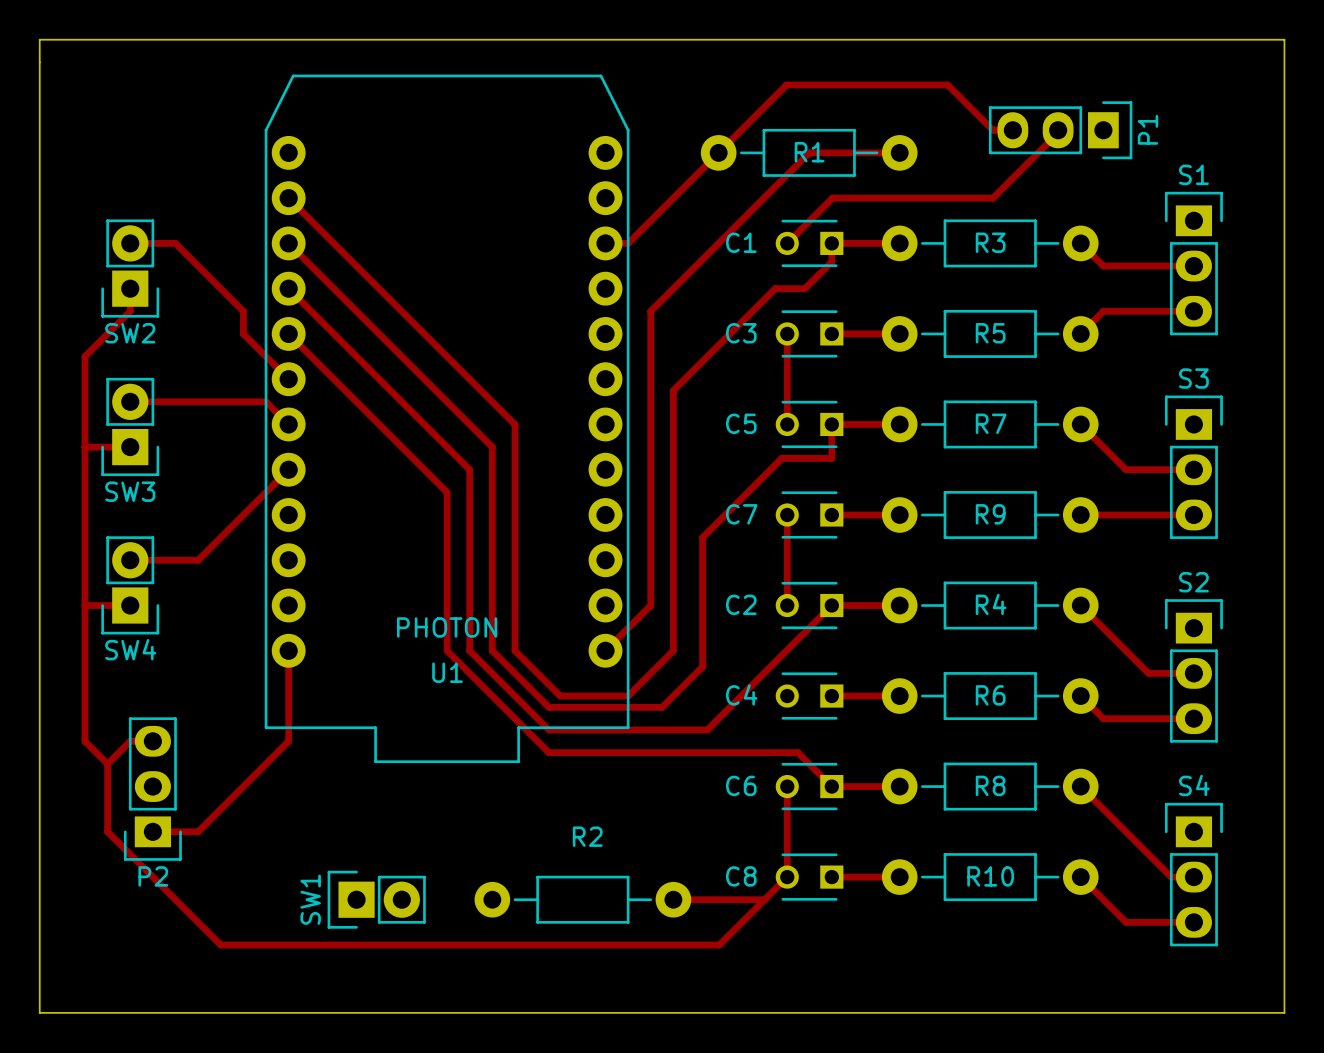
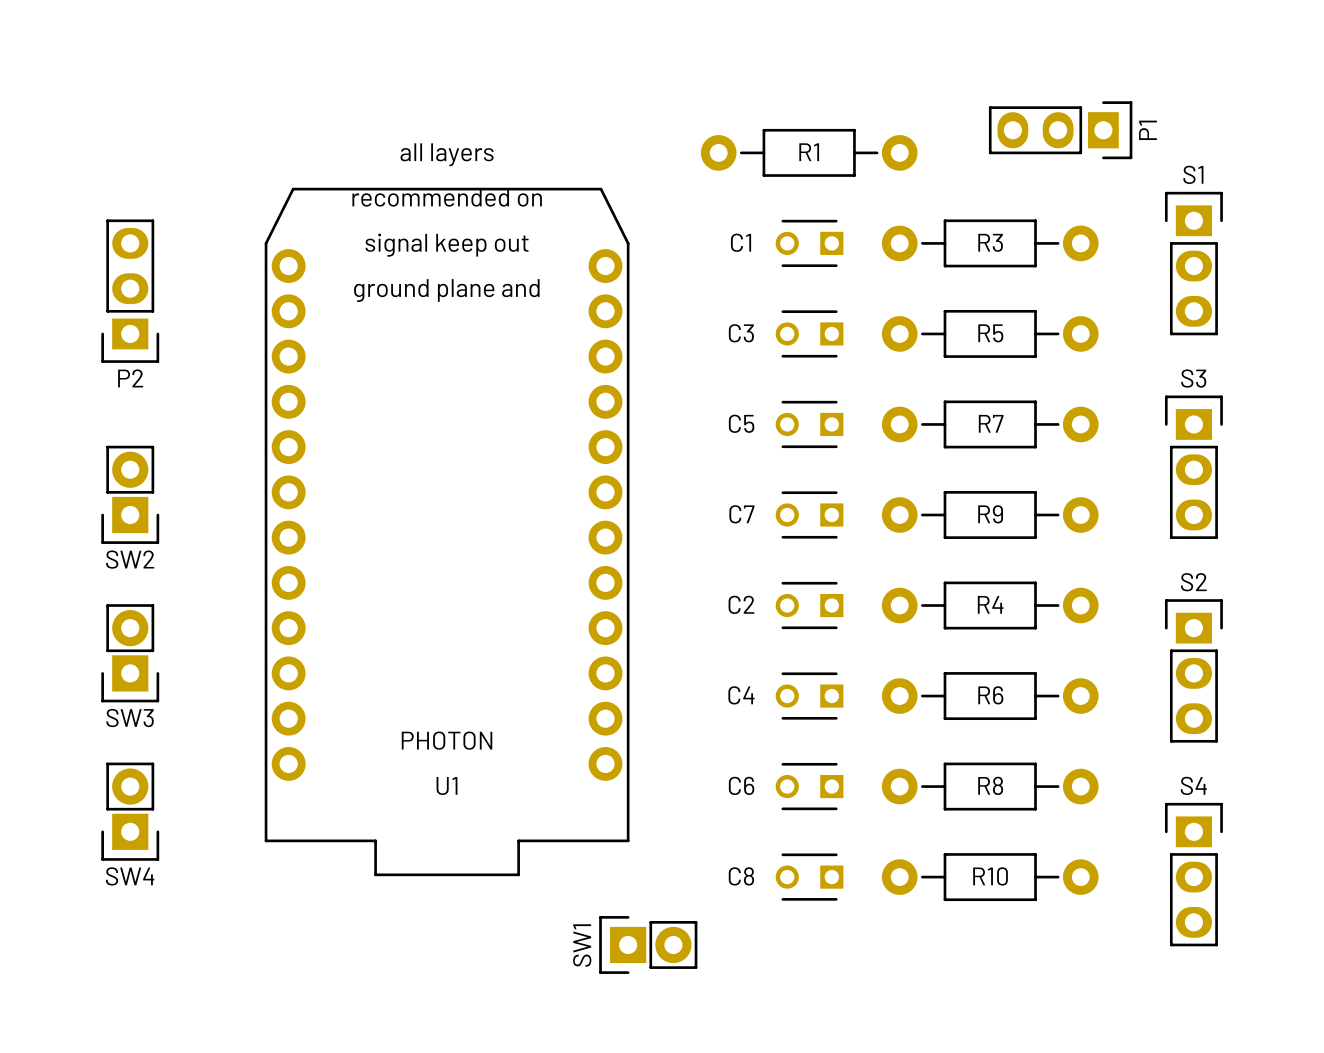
board edge: (39, 39) (1284, 39) (1284, 1012) (39, 1012) (39, 39) -> none
track: (1012, 130) (993, 130) (947, 84) (786, 84) (628, 243) (605, 243) -> none
track: (1058, 130) (1058, 132) (992, 198) (832, 198) (787, 243) -> none
track: (899, 152) (809, 152) (650, 311) (650, 605) (605, 650) -> none
U1 text: none -> all layers (447, 154)
U1 text: none -> recommended on (447, 197)
track: (288, 198) (514, 424) (514, 650) (560, 696) (628, 696) (673, 650) (673, 390) (775, 288) (804, 288) (831, 261) (831, 243) (899, 243) -> none
track: (130, 243) (175, 243) (243, 311) (243, 333) (288, 379) -> none
track: (288, 243) (492, 447) (492, 650) (548, 707) (662, 707) (702, 666) (702, 537) (781, 458) (831, 458) (831, 424) (899, 424) -> none
track: (1080, 243) (1103, 266) (1193, 266) -> none
U1 text: none -> signal keep out (447, 245)
SW2 position: (130, 268) -> (130, 494)
track: (130, 288) (130, 311) (84, 356) (84, 741) (107, 763) -> none
track: (288, 288) (469, 469) (469, 650) (548, 729) (707, 729) (831, 605) (899, 605) -> none
U1 text: none -> ground plane and (446, 290)
track: (1193, 311) (1103, 311) (1080, 333) -> none
track: (288, 333) (447, 492) (447, 650) (548, 752) (797, 752) (831, 786) (899, 786) -> none
track: (787, 333) (787, 424) -> none
track: (831, 333) (899, 333) -> none
track: (130, 401) (266, 401) (288, 424) -> none
U1 position: (447, 418) -> (447, 531)
track: (1080, 424) (1126, 469) (1193, 469) -> none
SW3 position: (130, 426) -> (130, 653)
track: (84, 447) (130, 447) -> none
track: (288, 469) (198, 560) (130, 560) -> none
track: (787, 514) (787, 605) -> none
track: (831, 514) (899, 514) -> none
track: (1080, 514) (1193, 514) -> none
SW4 position: (130, 585) -> (130, 811)
track: (84, 605) (130, 605) -> none
track: (1080, 605) (1148, 673) (1193, 673) -> none
track: (288, 650) (288, 741) (198, 831) (152, 831) -> none
track: (831, 696) (899, 696) -> none
track: (1080, 696) (1103, 718) (1193, 718) -> none
track: (152, 741) (130, 741) (107, 763) -> none
track: (107, 763) (107, 831) (220, 944) (719, 944) (787, 877) (787, 786) -> none
track: (1080, 786) (1171, 877) (1193, 877) -> none
P2 position: (152, 789) -> (130, 291)
track: (831, 877) (899, 877) -> none
track: (1080, 877) (1126, 922) (1193, 922) -> none
SW1 position: (376, 899) -> (648, 944)
R2: (582, 899) -> none
track: (673, 899) (764, 899) -> none

